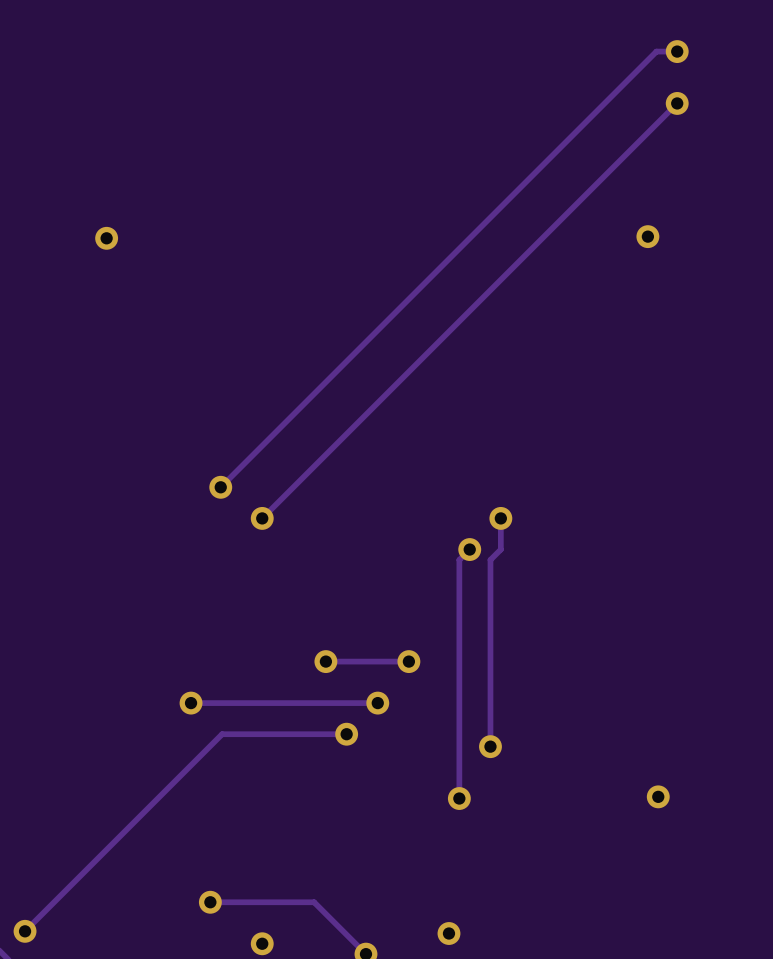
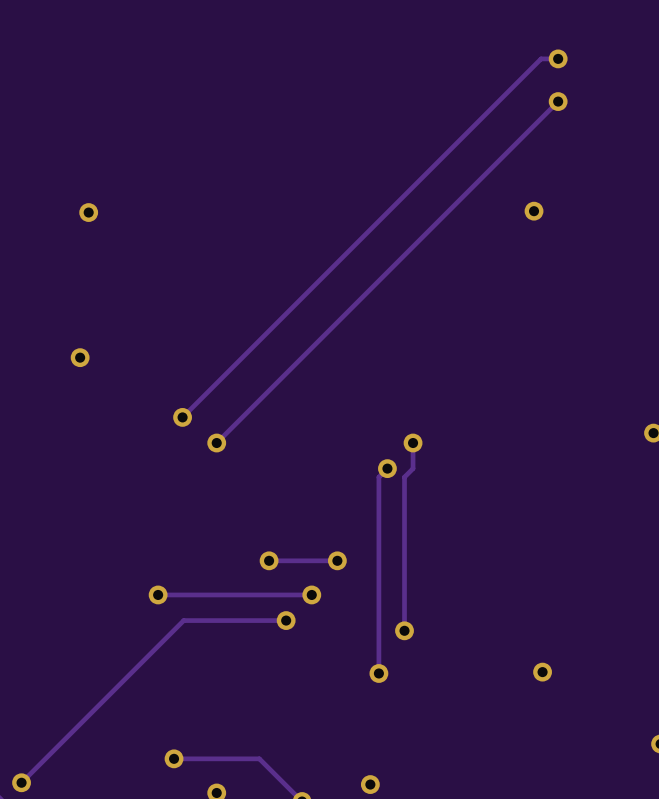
via: none -> (80, 357)

